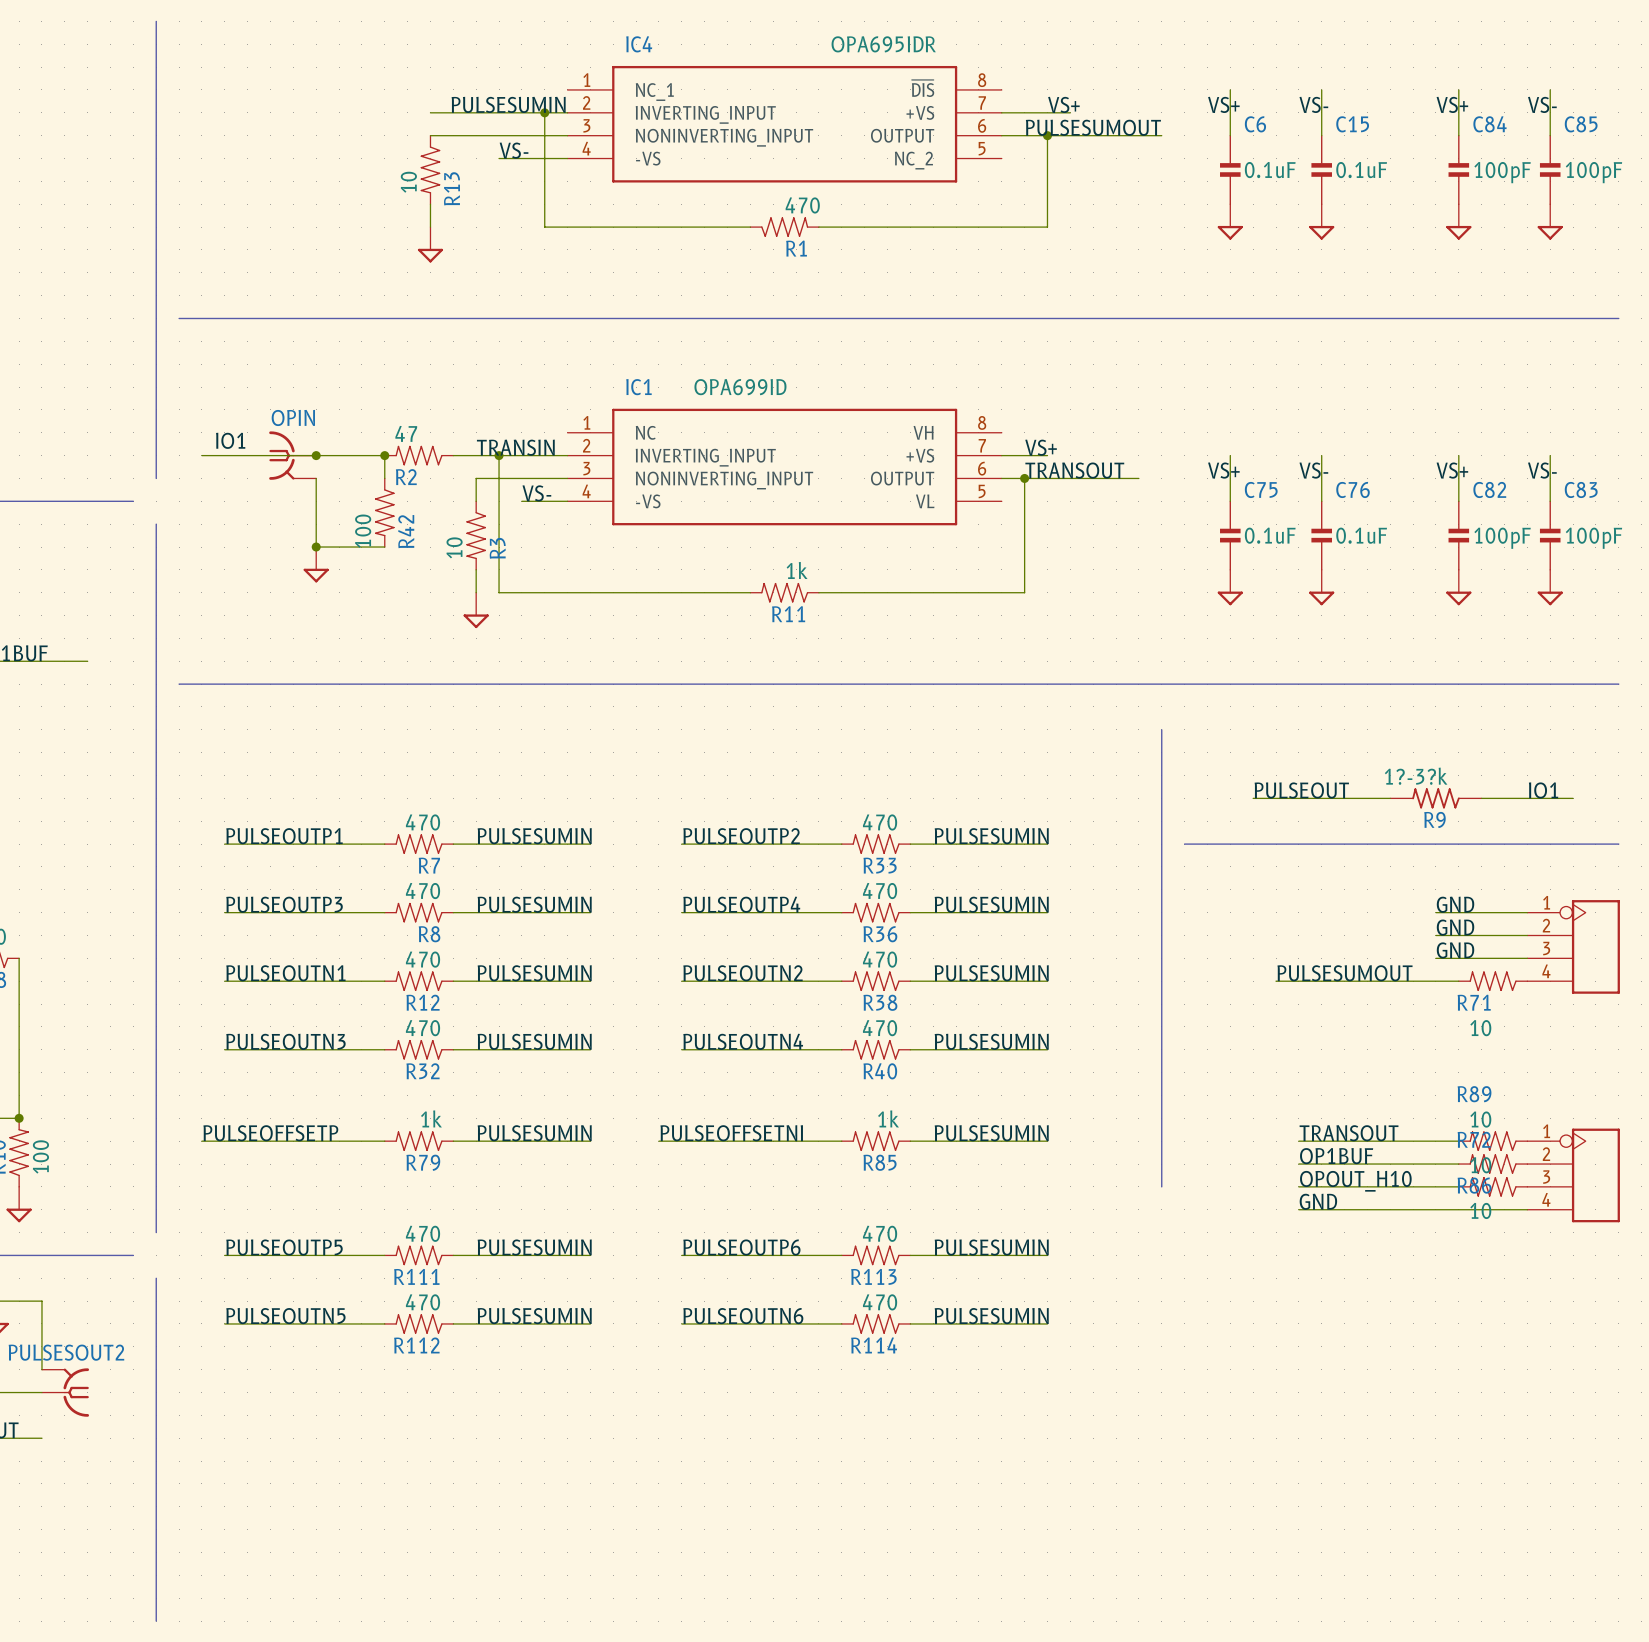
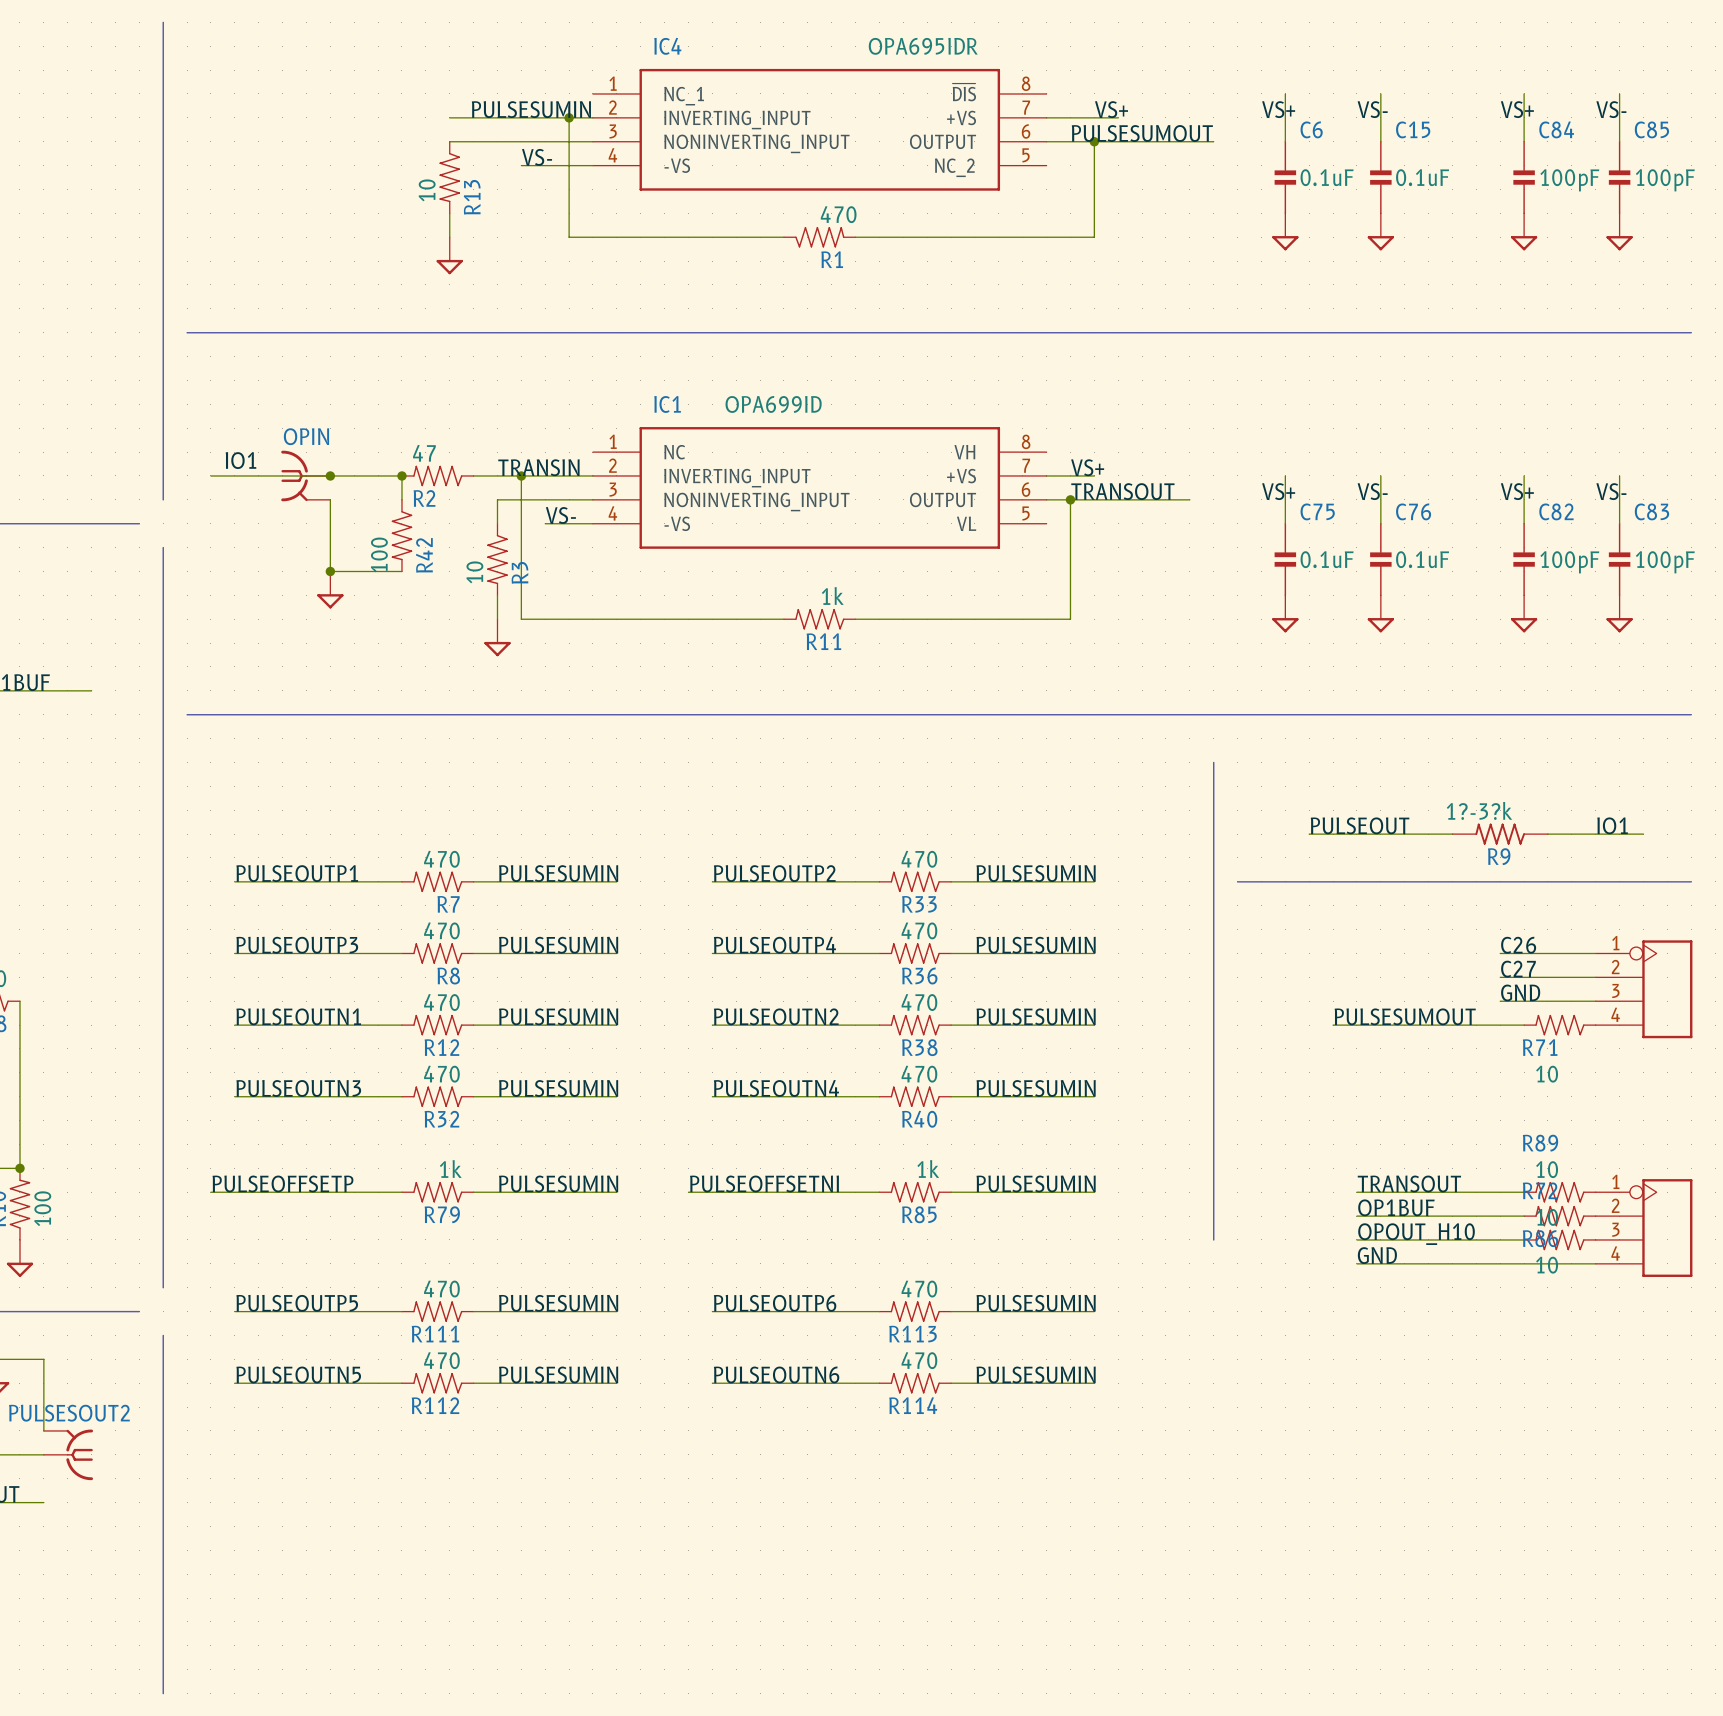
label: GND (1455, 904) -> C26 (1518, 945)
label: GND (1455, 927) -> C27 (1518, 969)

